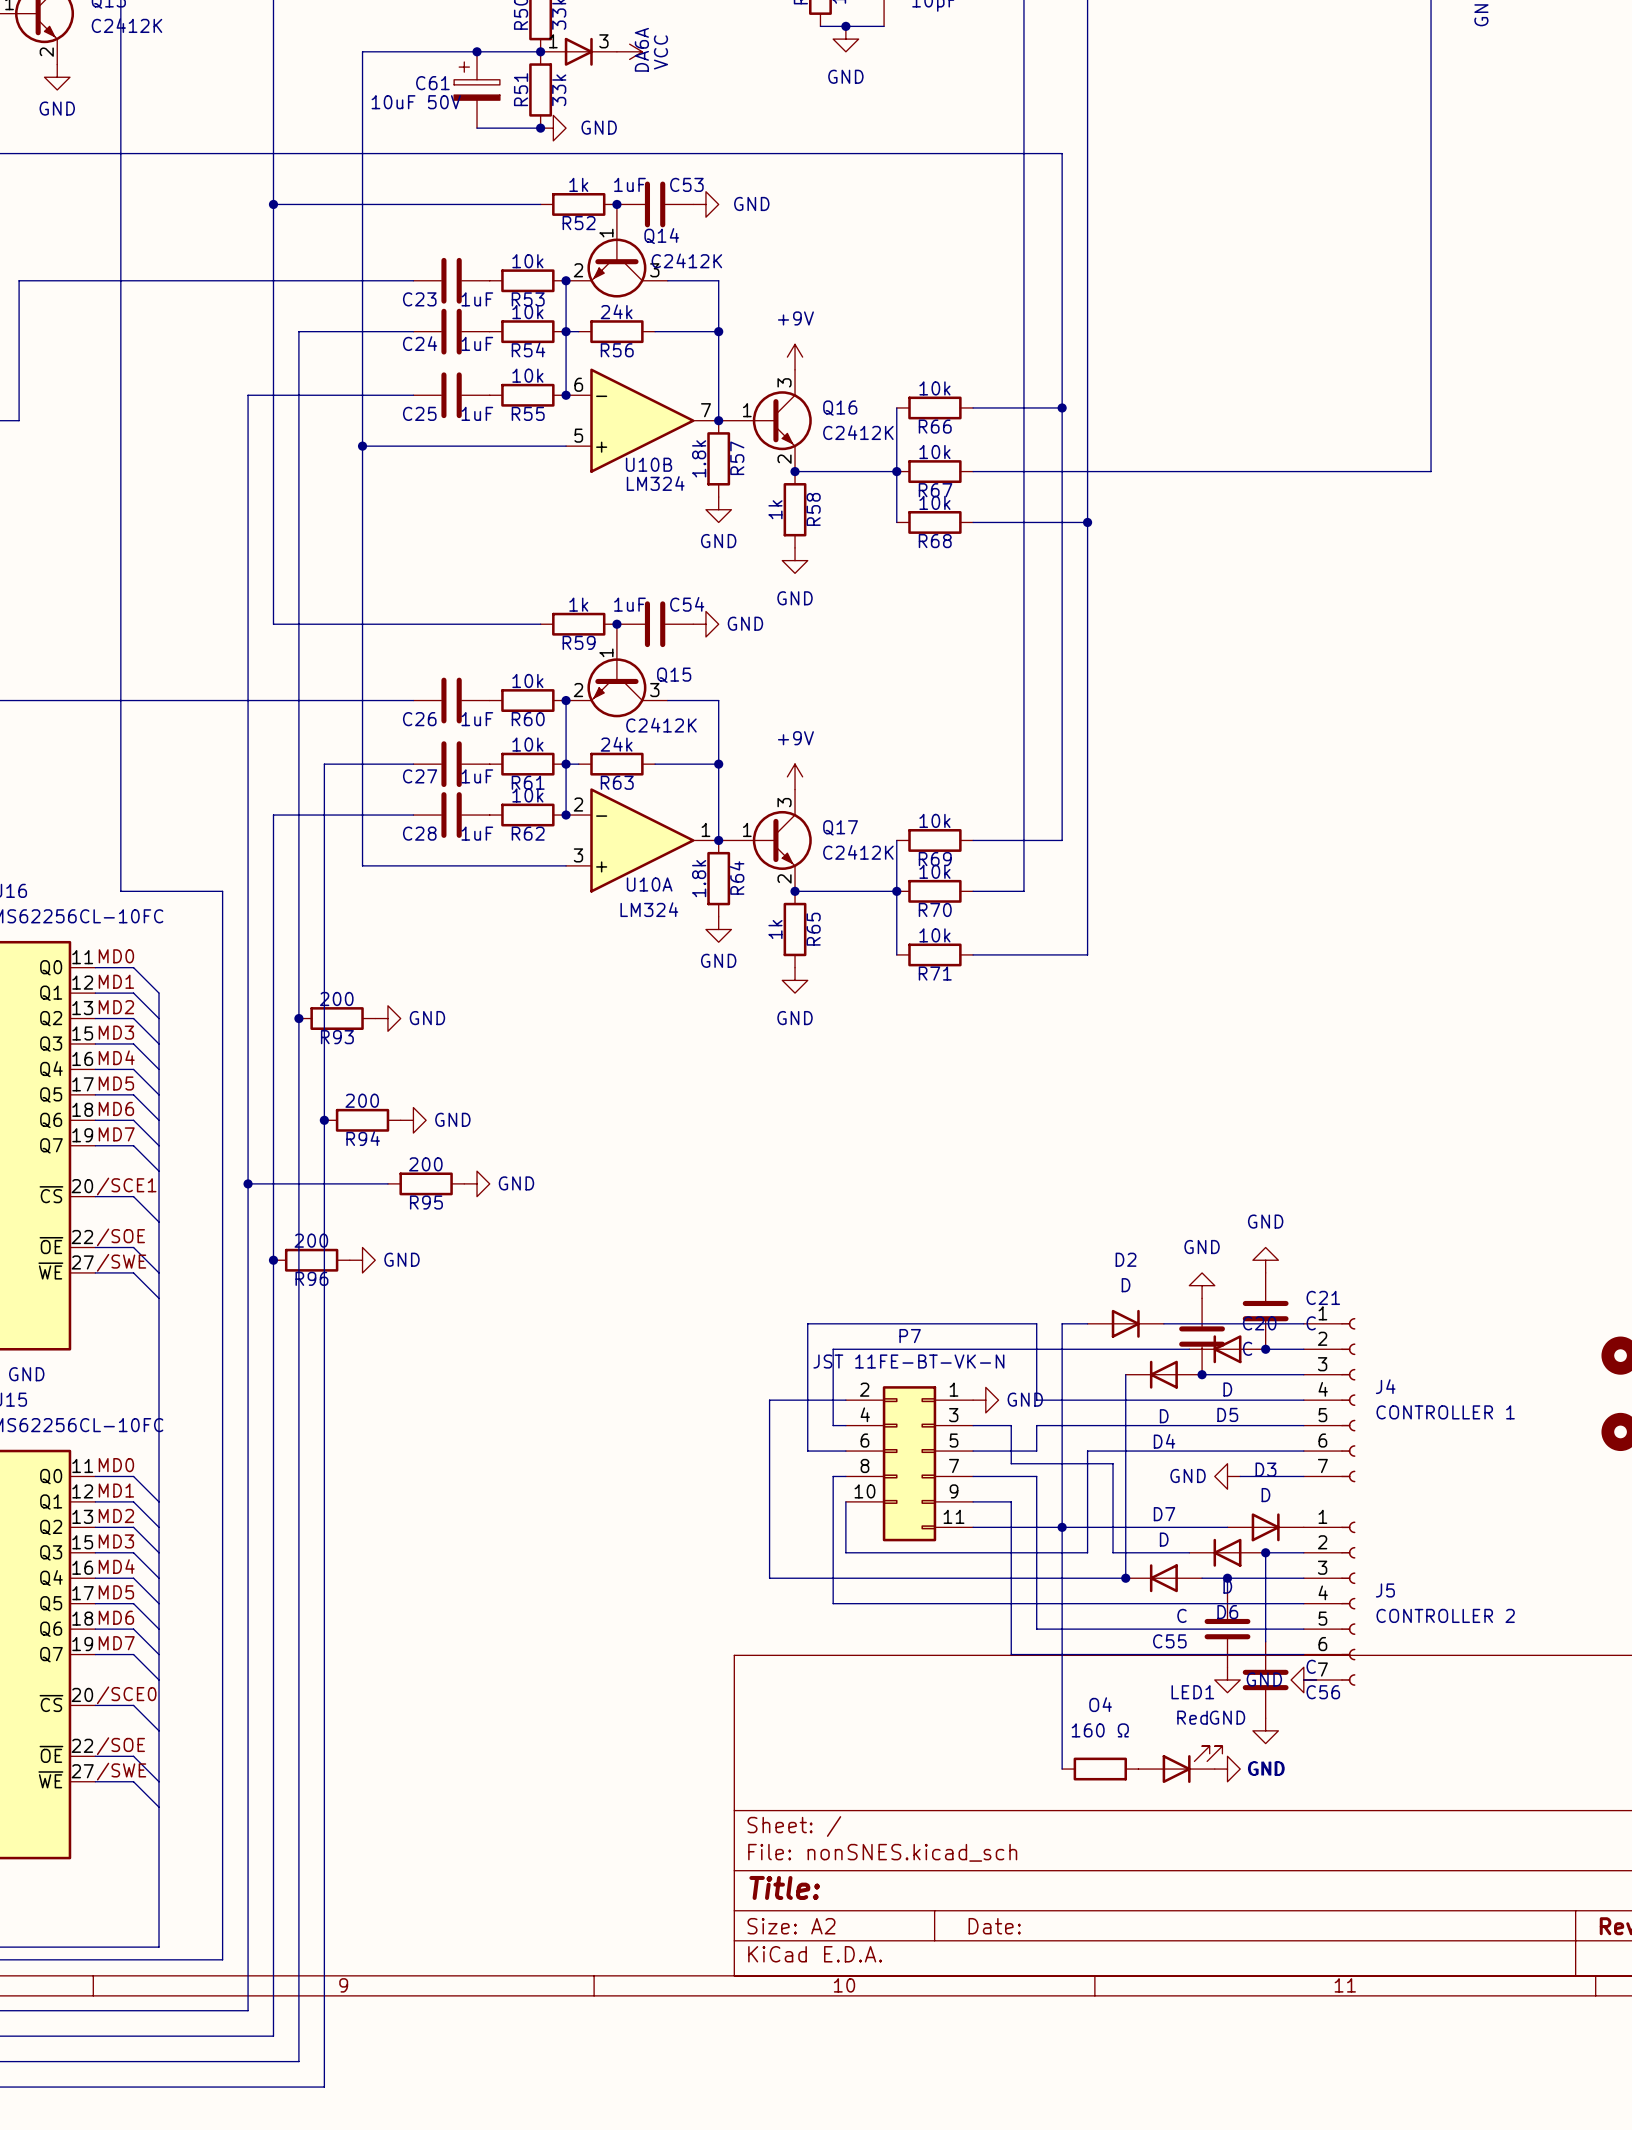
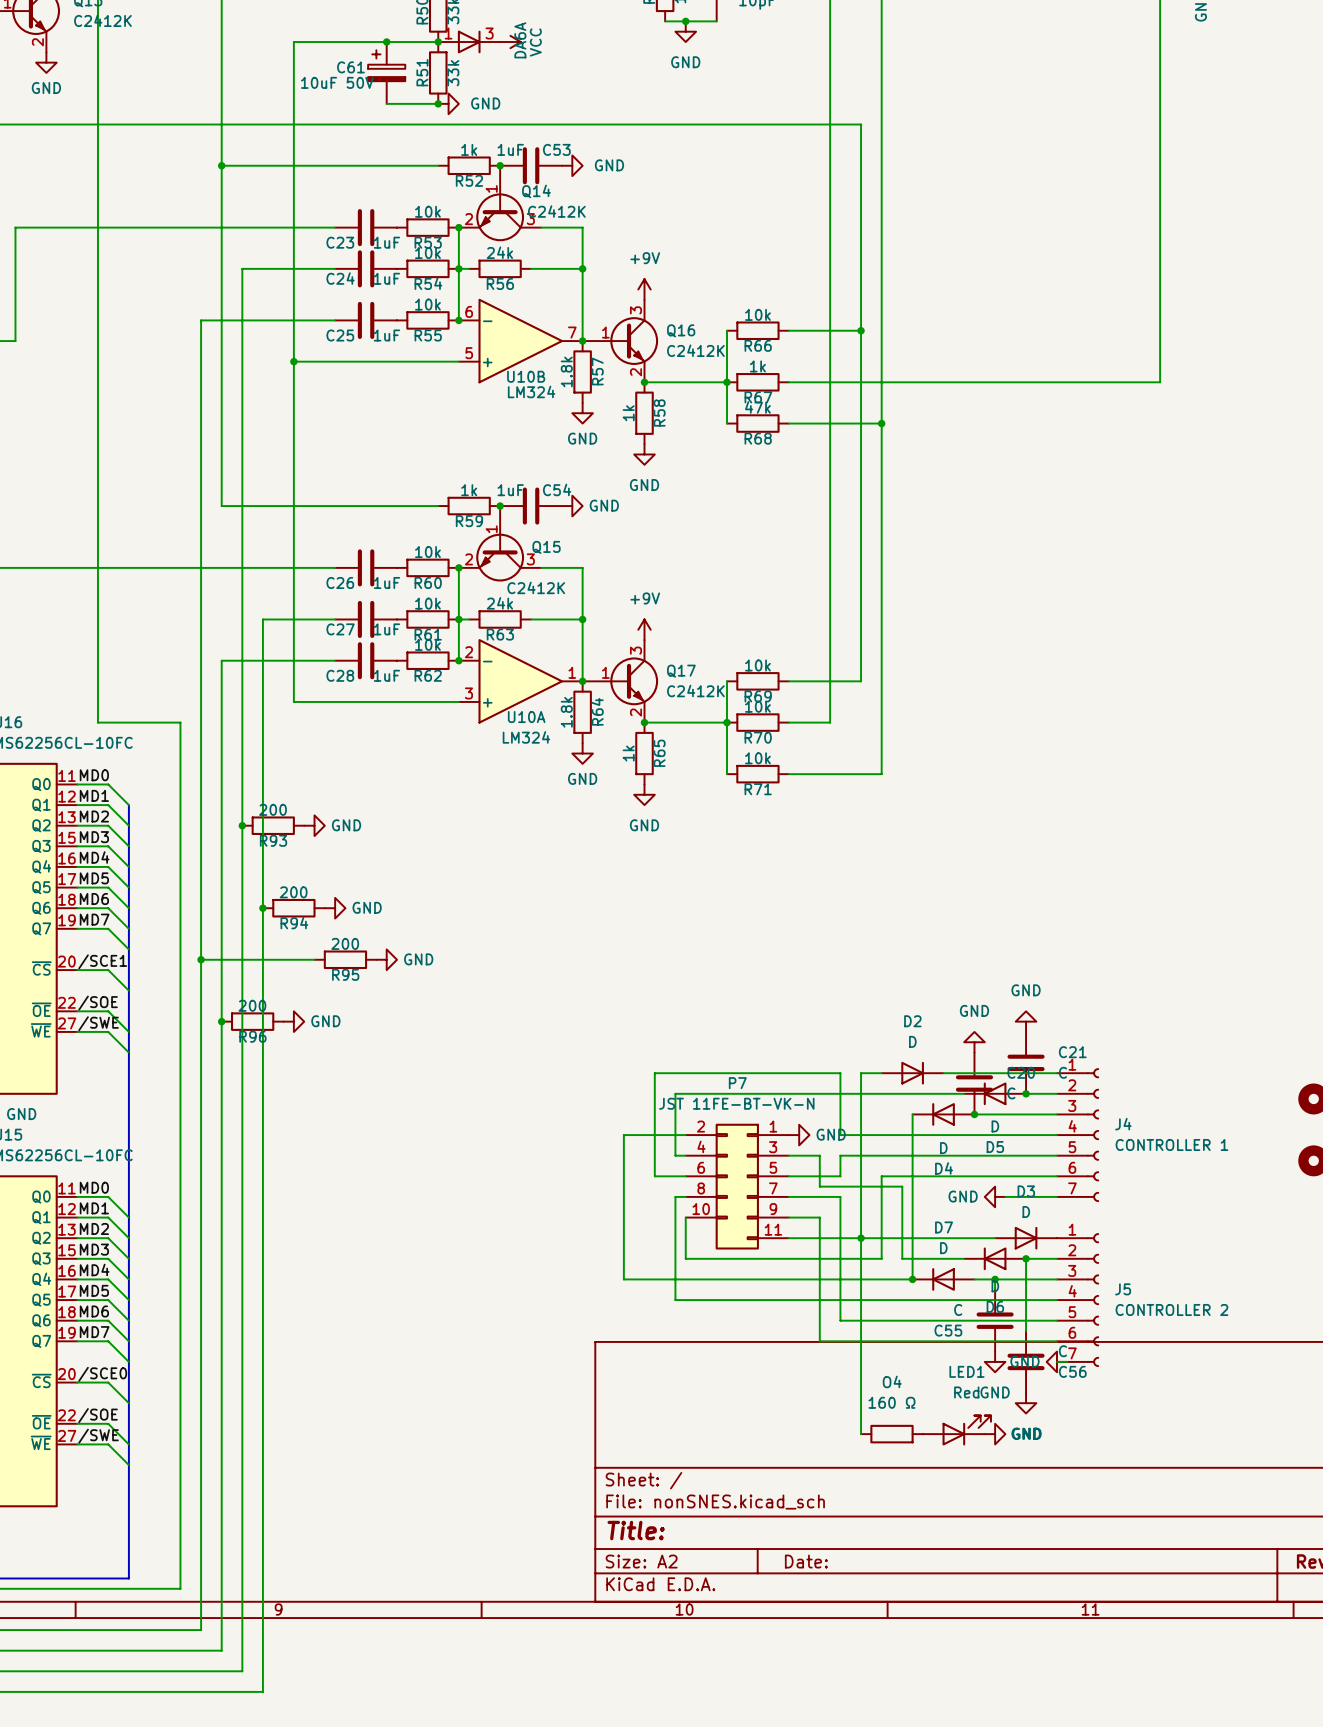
R67 value: 10k (934, 452) -> 1k (757, 366)
R68 value: 10k (934, 502) -> 47k (757, 407)

